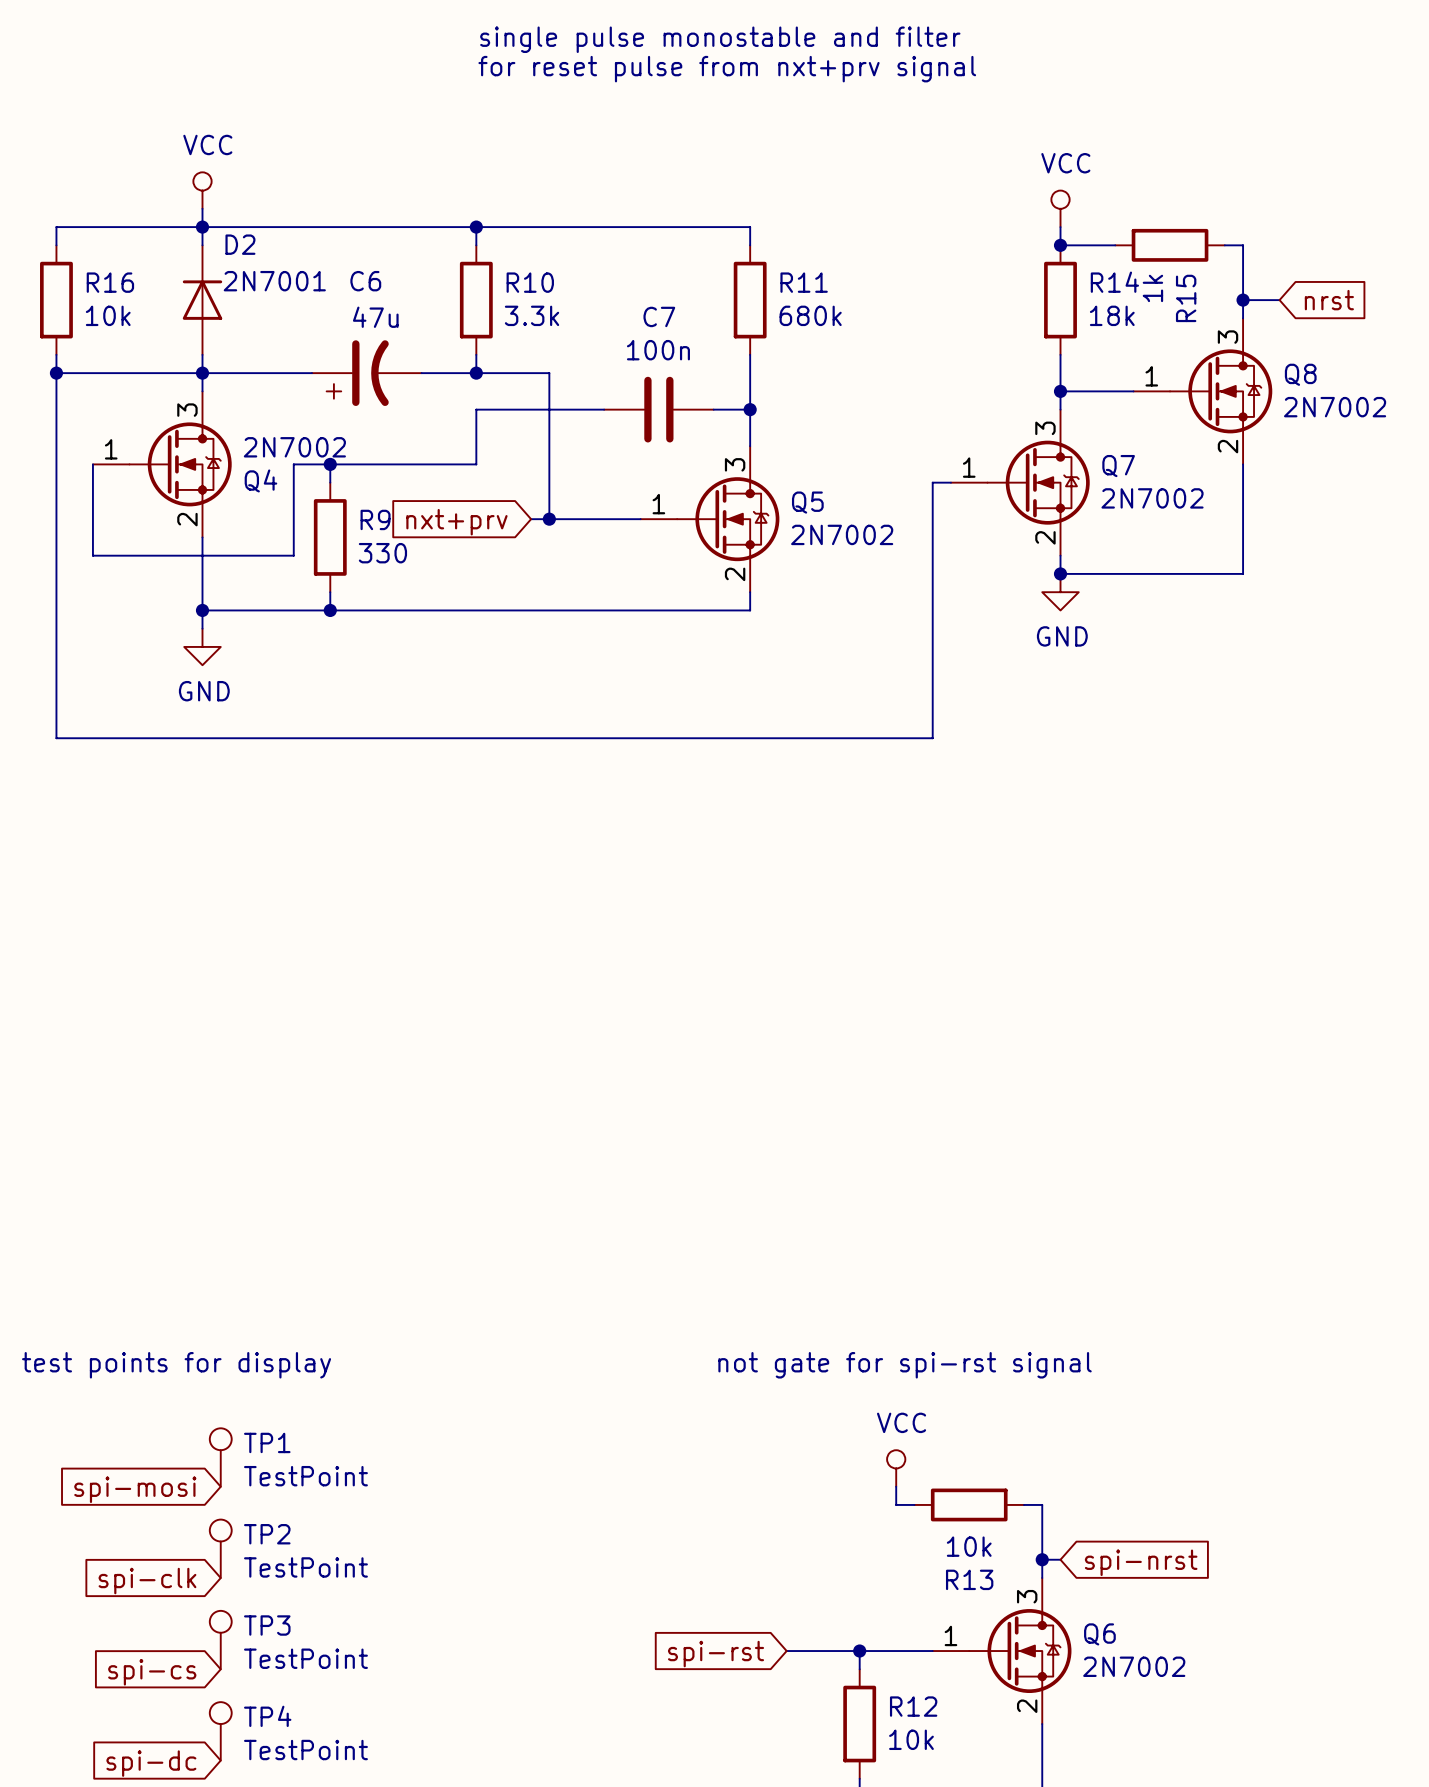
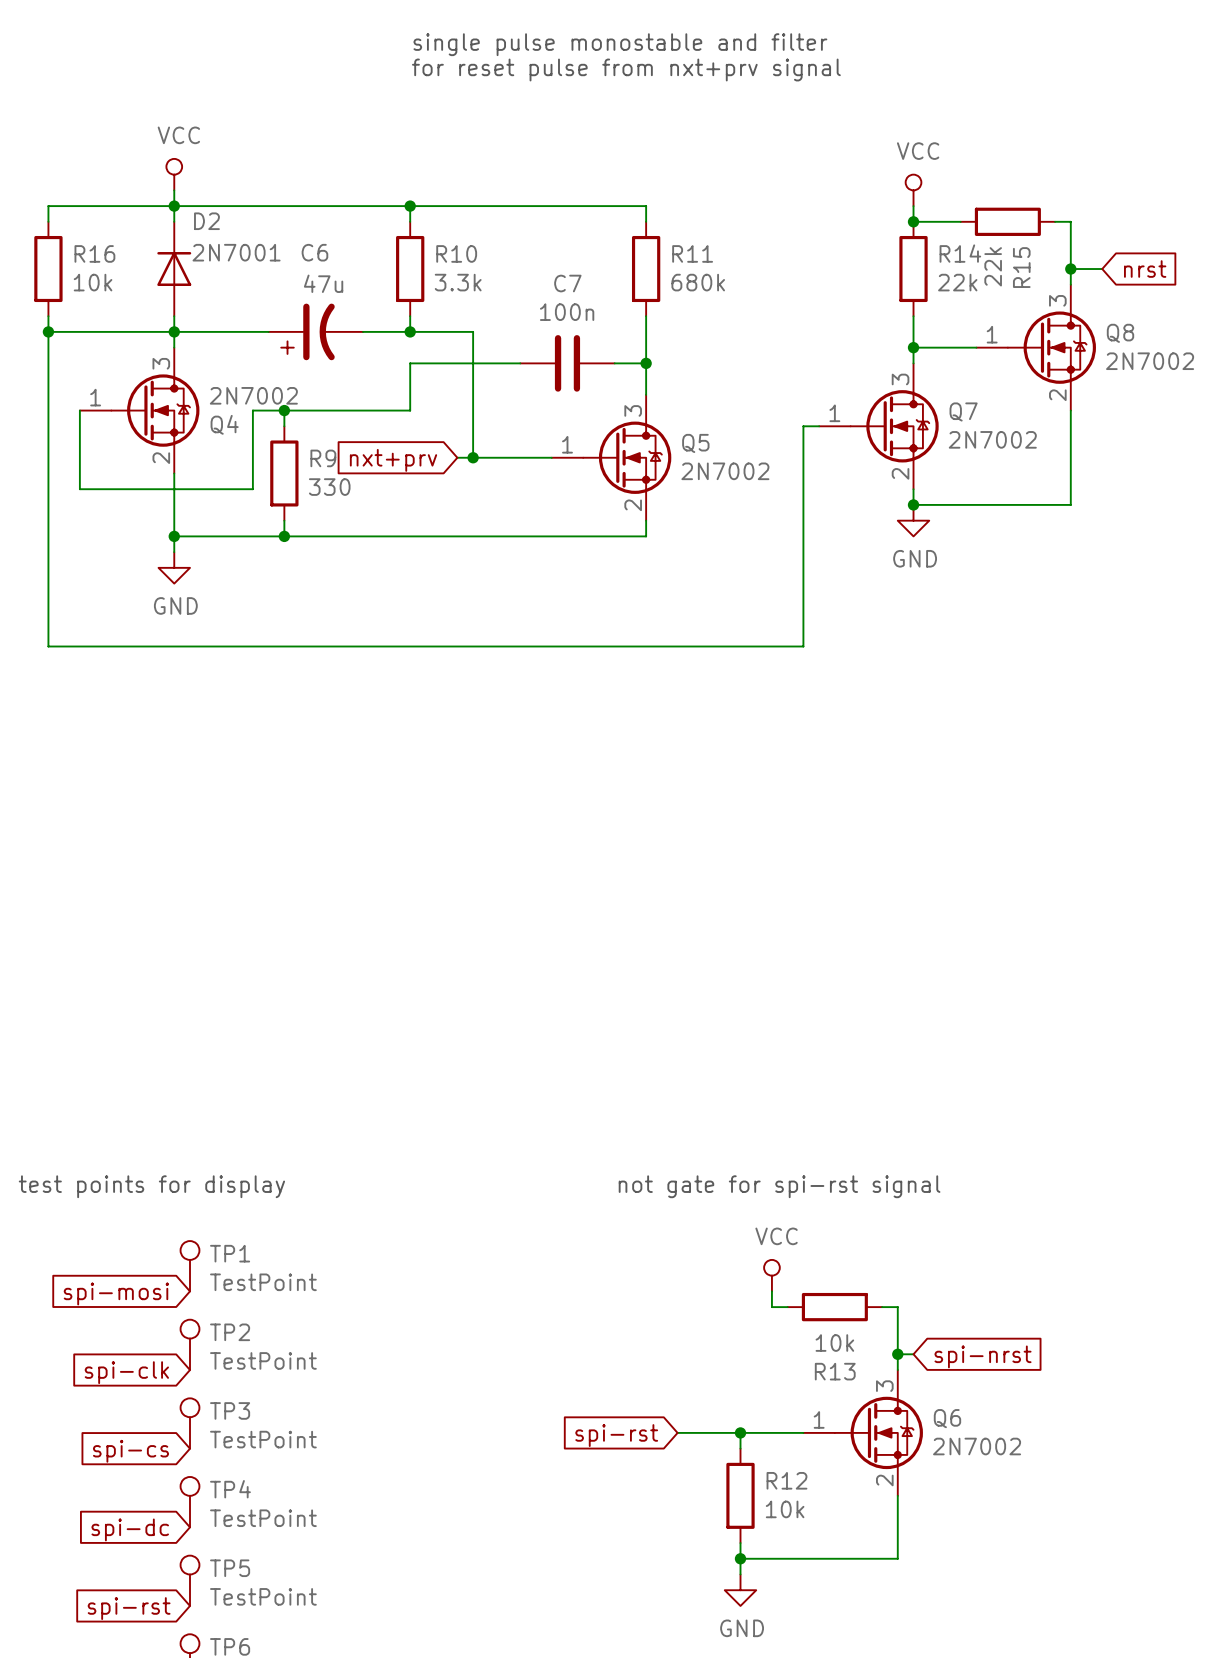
R15 value: 1k (1152, 288) -> 22k (993, 266)
R14 value: 18k (1112, 315) -> 22k (957, 282)

